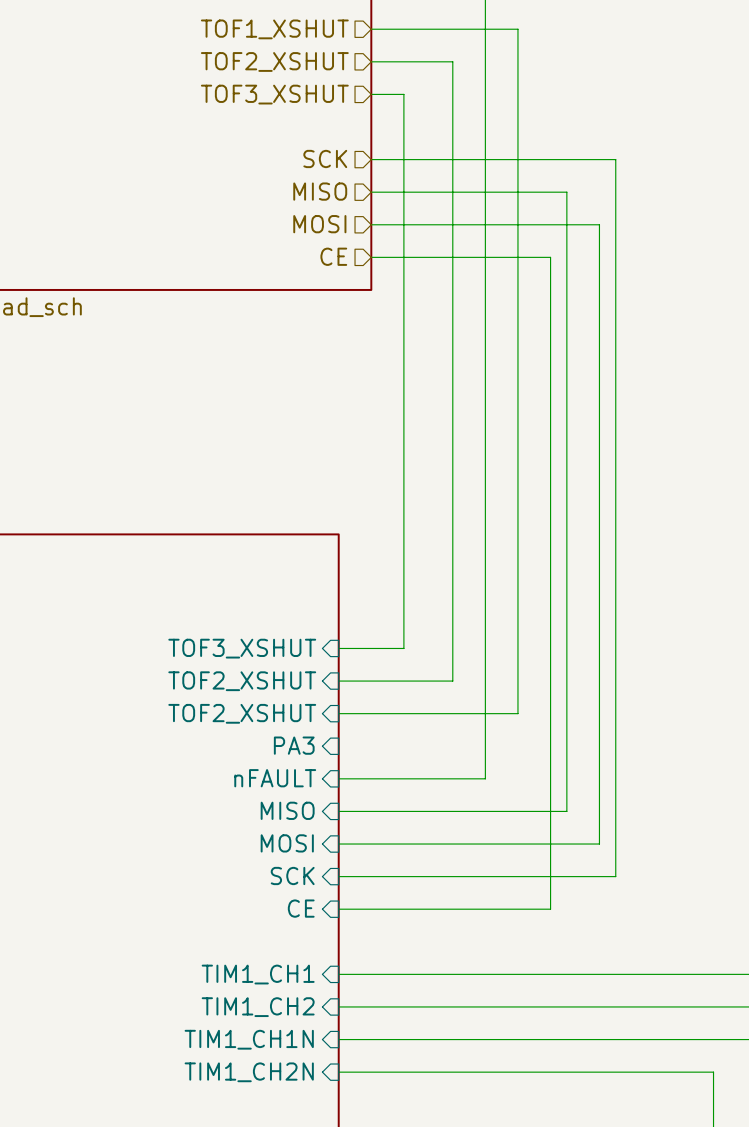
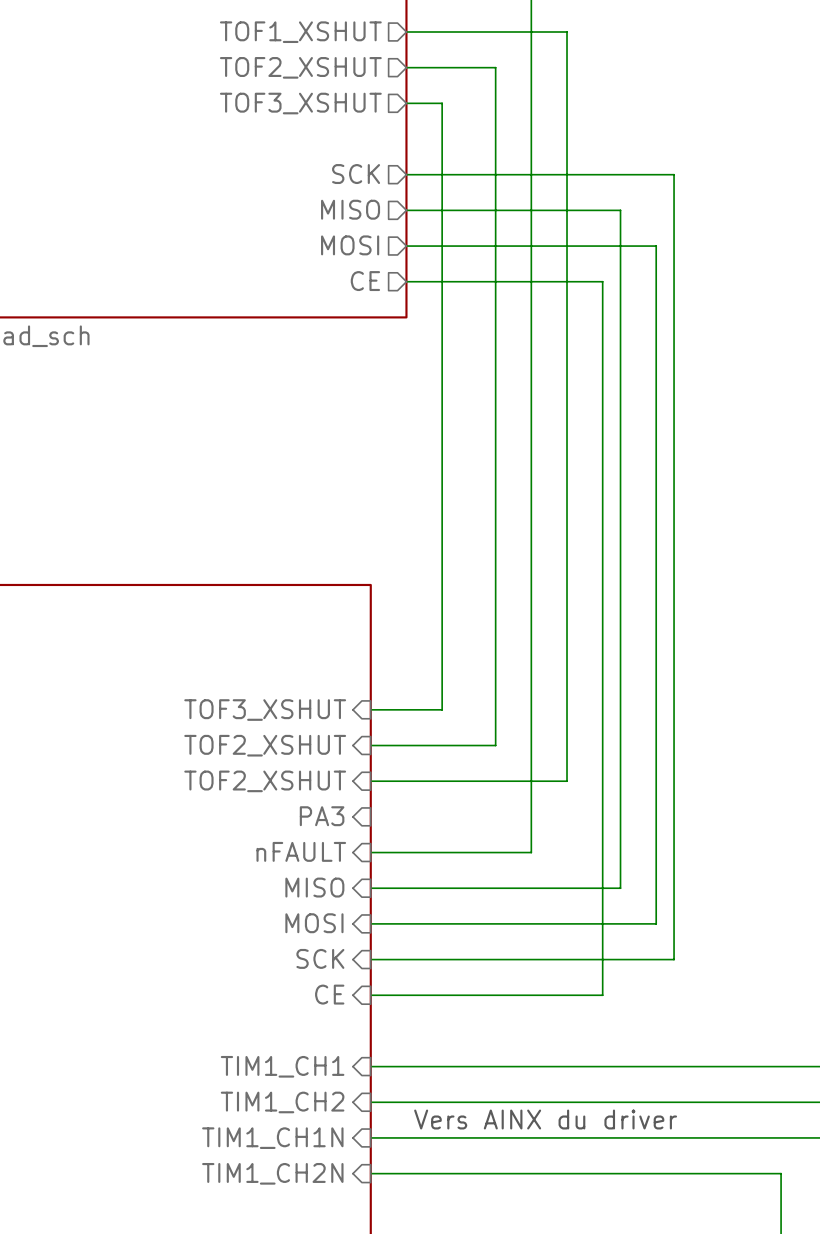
text: none -> Vers AINX du driver (545, 1119)

